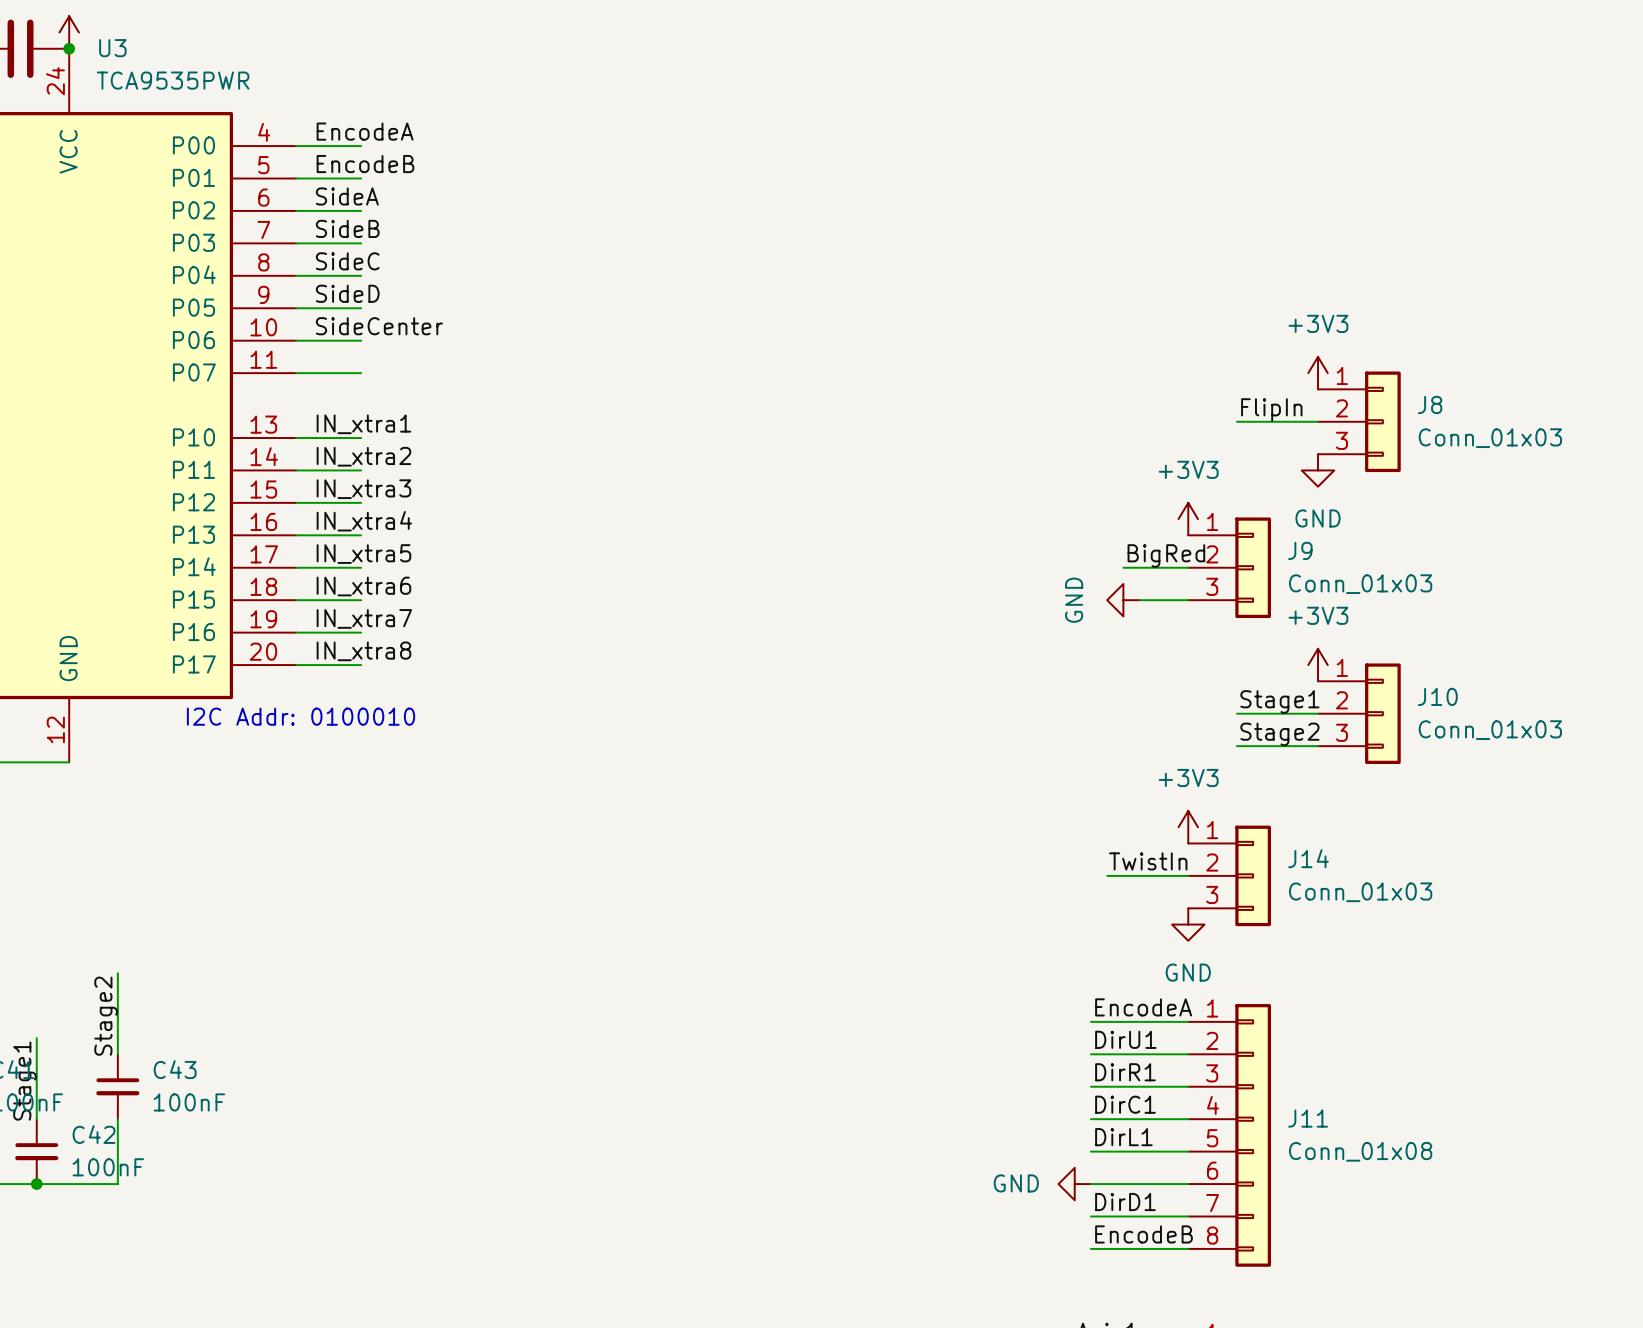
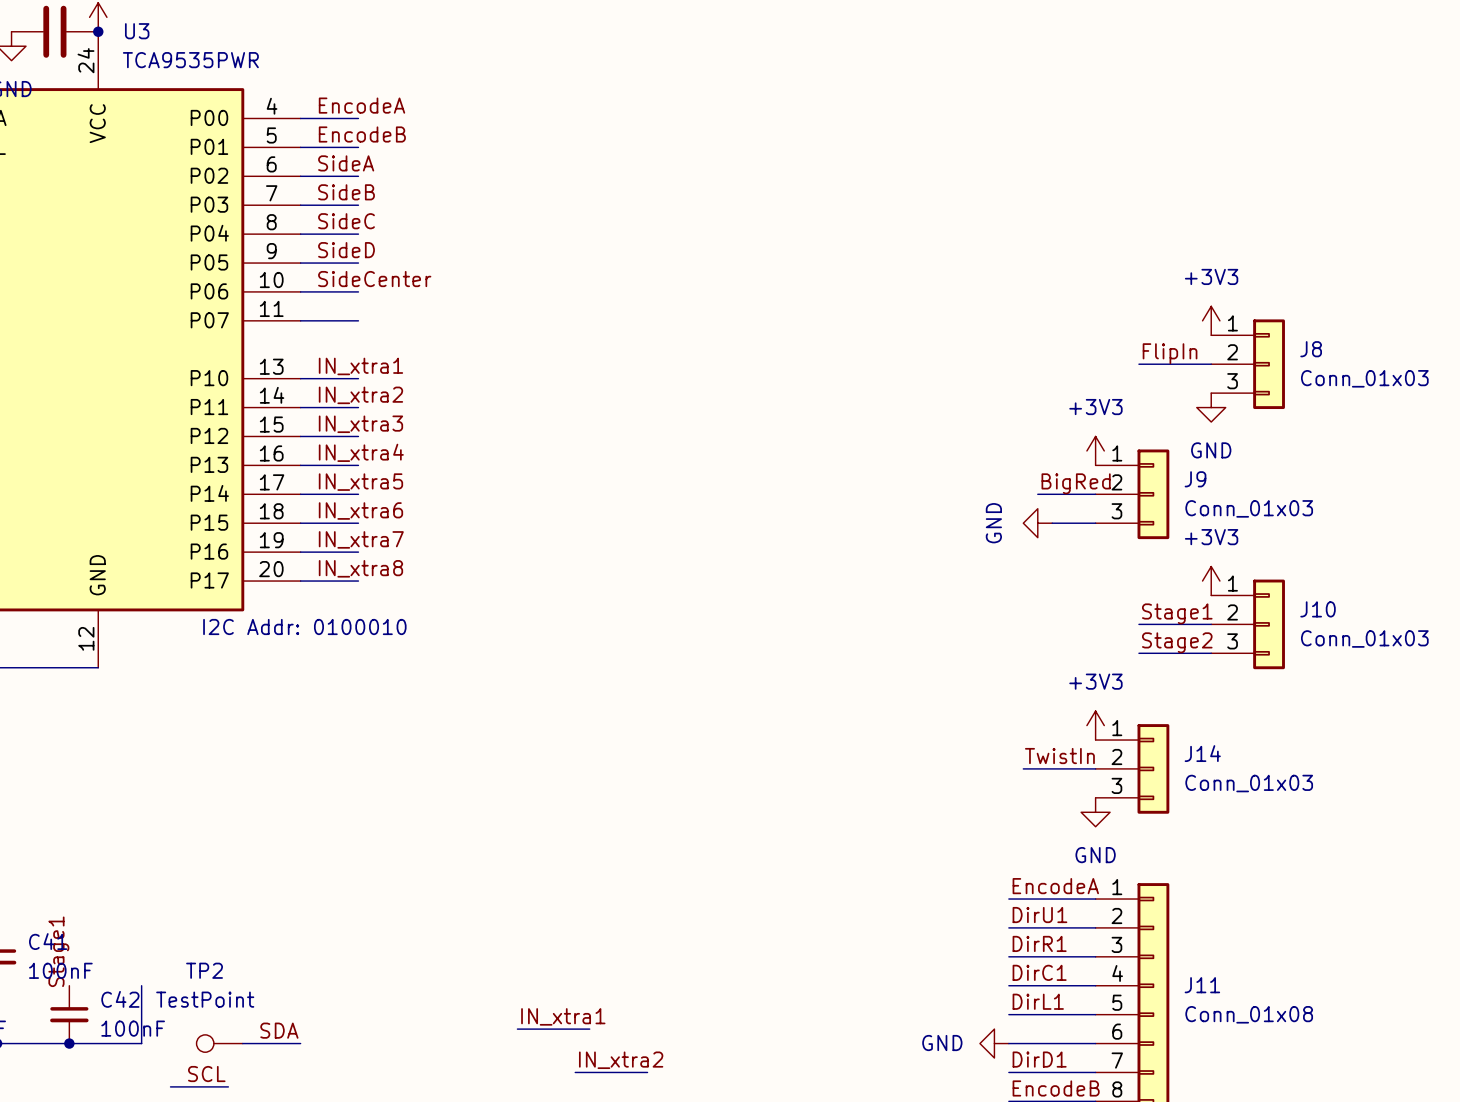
wire: (117, 973) (117, 1054) -> none
label: Stage2 (106, 1016) -> none
wire: (36, 1038) (36, 1119) -> none
C43: 100nF (117, 1086) -> none
label: none -> IN_xtra1 (563, 1016)
wire: none -> (517, 1029) (589, 1029)
label: none -> SDA (279, 1030)
TP2: none -> TestPoint (219, 1043)
wire: none -> (242, 1043) (300, 1043)
label: none -> IN_xtra2 (621, 1060)
wire: none -> (575, 1072) (647, 1072)
label: none -> SCL (206, 1074)
wire: none -> (170, 1086) (228, 1086)

